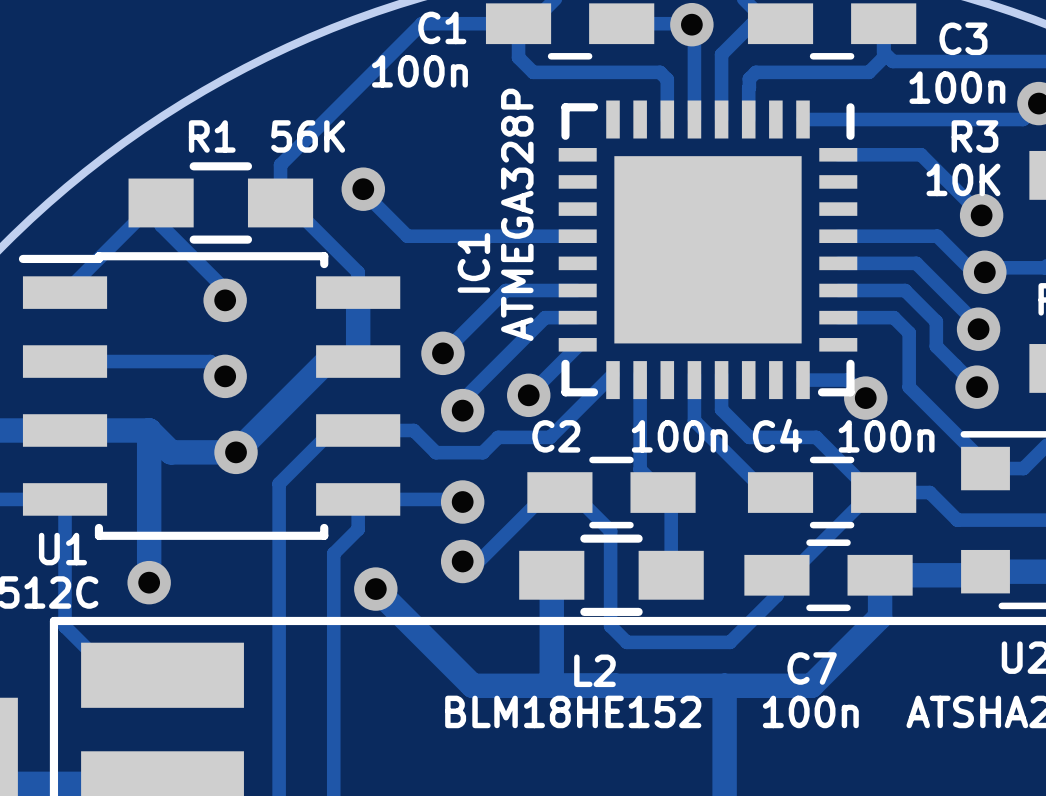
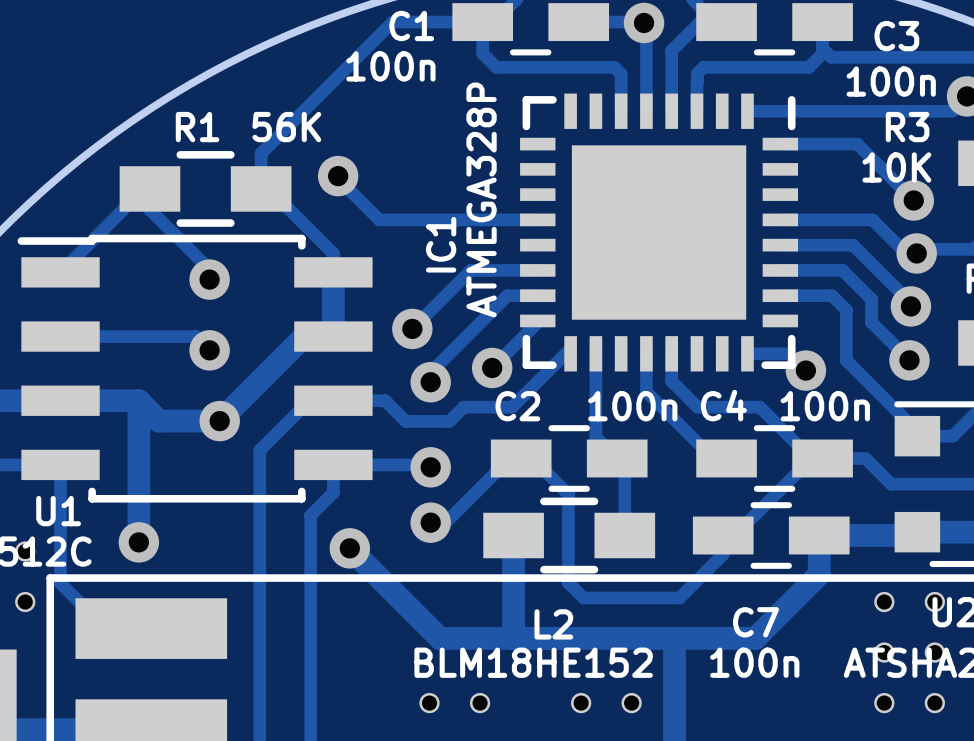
part: none -> (25, 551)
part: none -> (25, 602)
part: none -> (884, 602)
part: none -> (934, 602)
part: none -> (884, 652)
part: none -> (934, 652)
part: none -> (429, 703)
part: none -> (480, 703)
part: none -> (581, 703)
part: none -> (631, 703)
part: none -> (884, 703)
part: none -> (934, 703)

